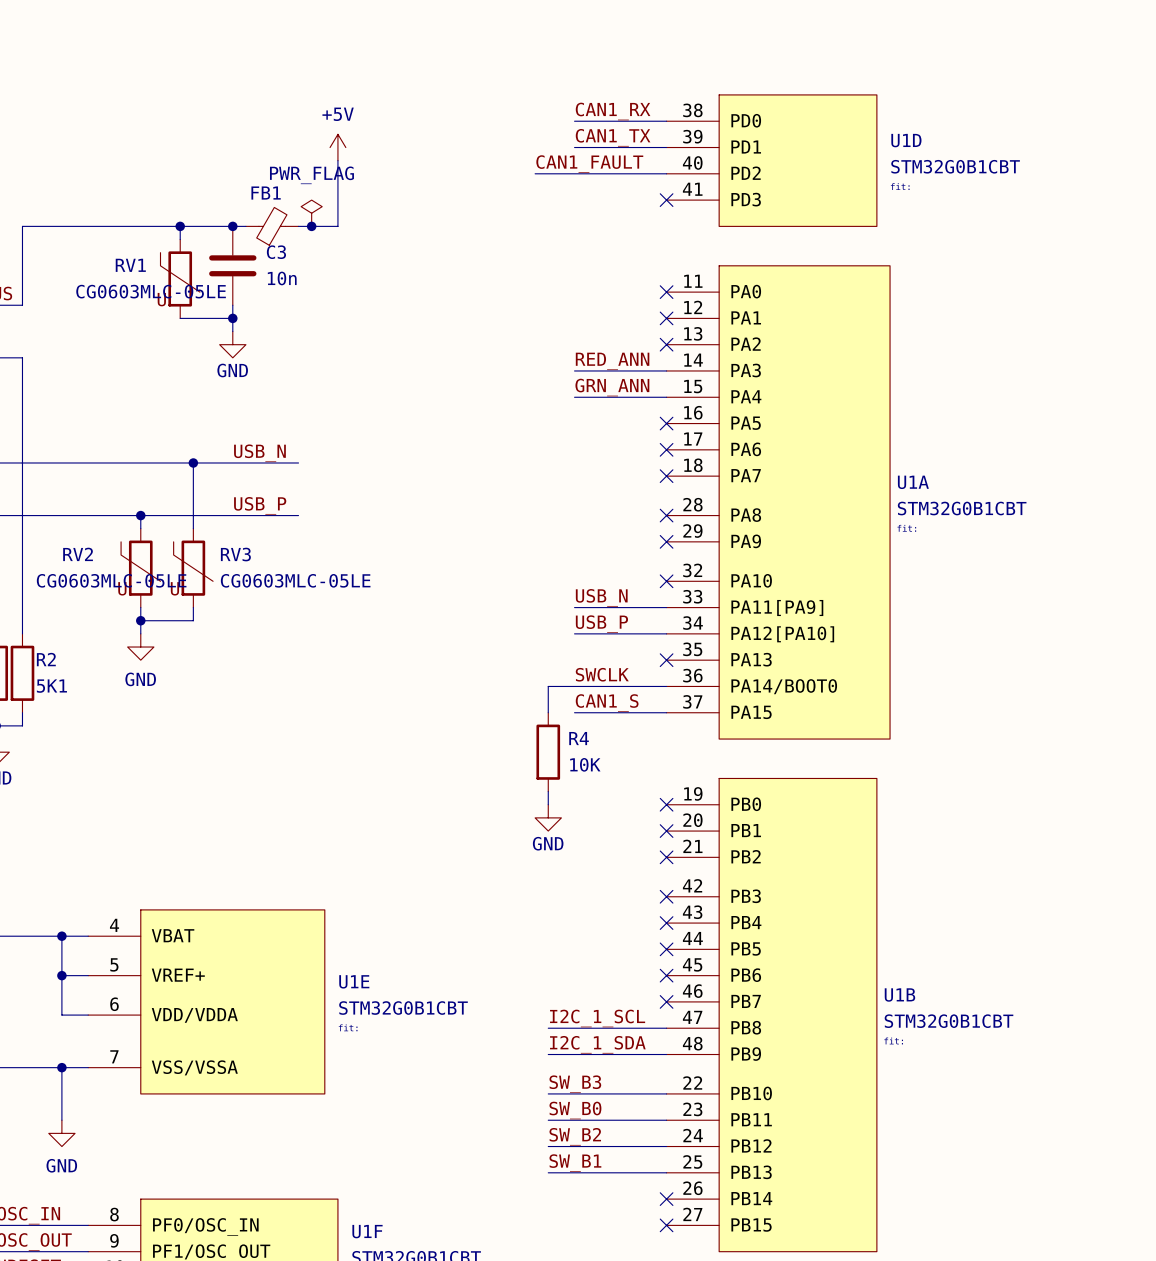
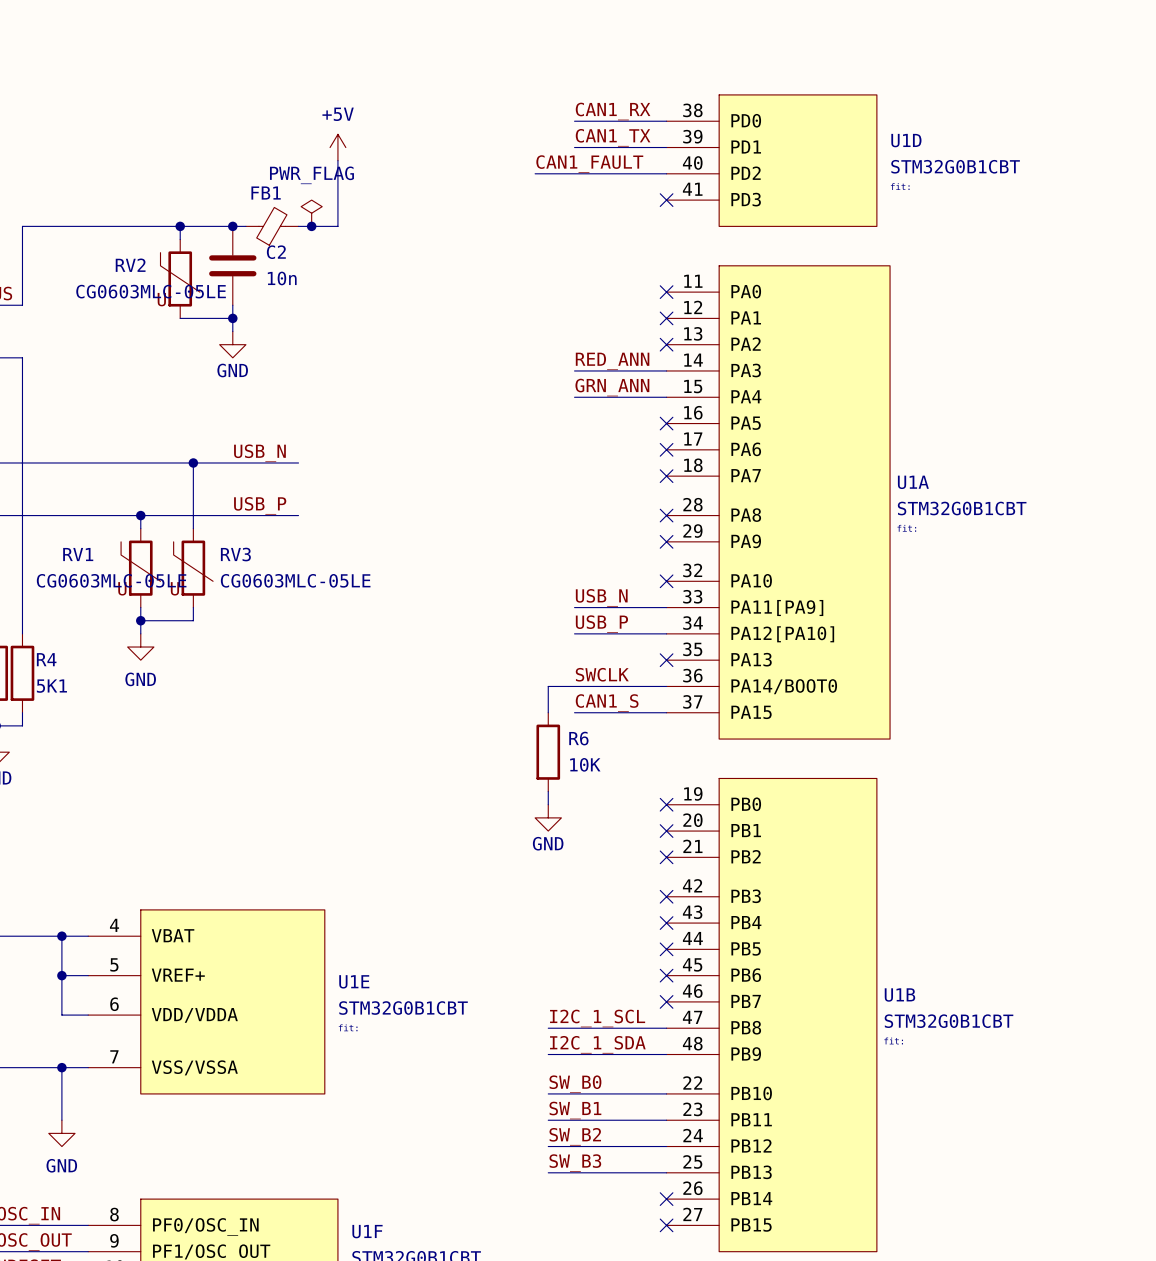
C3 name: C3 (276, 252) -> C2 (276, 252)
RV1 name: RV1 (130, 265) -> RV2 (130, 265)
RV2 name: RV2 (78, 554) -> RV1 (78, 554)
R2 name: R2 (46, 659) -> R4 (46, 659)
R4 name: R4 (579, 738) -> R6 (578, 738)
label: SW_B3 (575, 1084) -> SW_B0 (575, 1084)
label: SW_B0 (575, 1110) -> SW_B1 (575, 1110)
label: SW_B1 (575, 1163) -> SW_B3 (575, 1163)

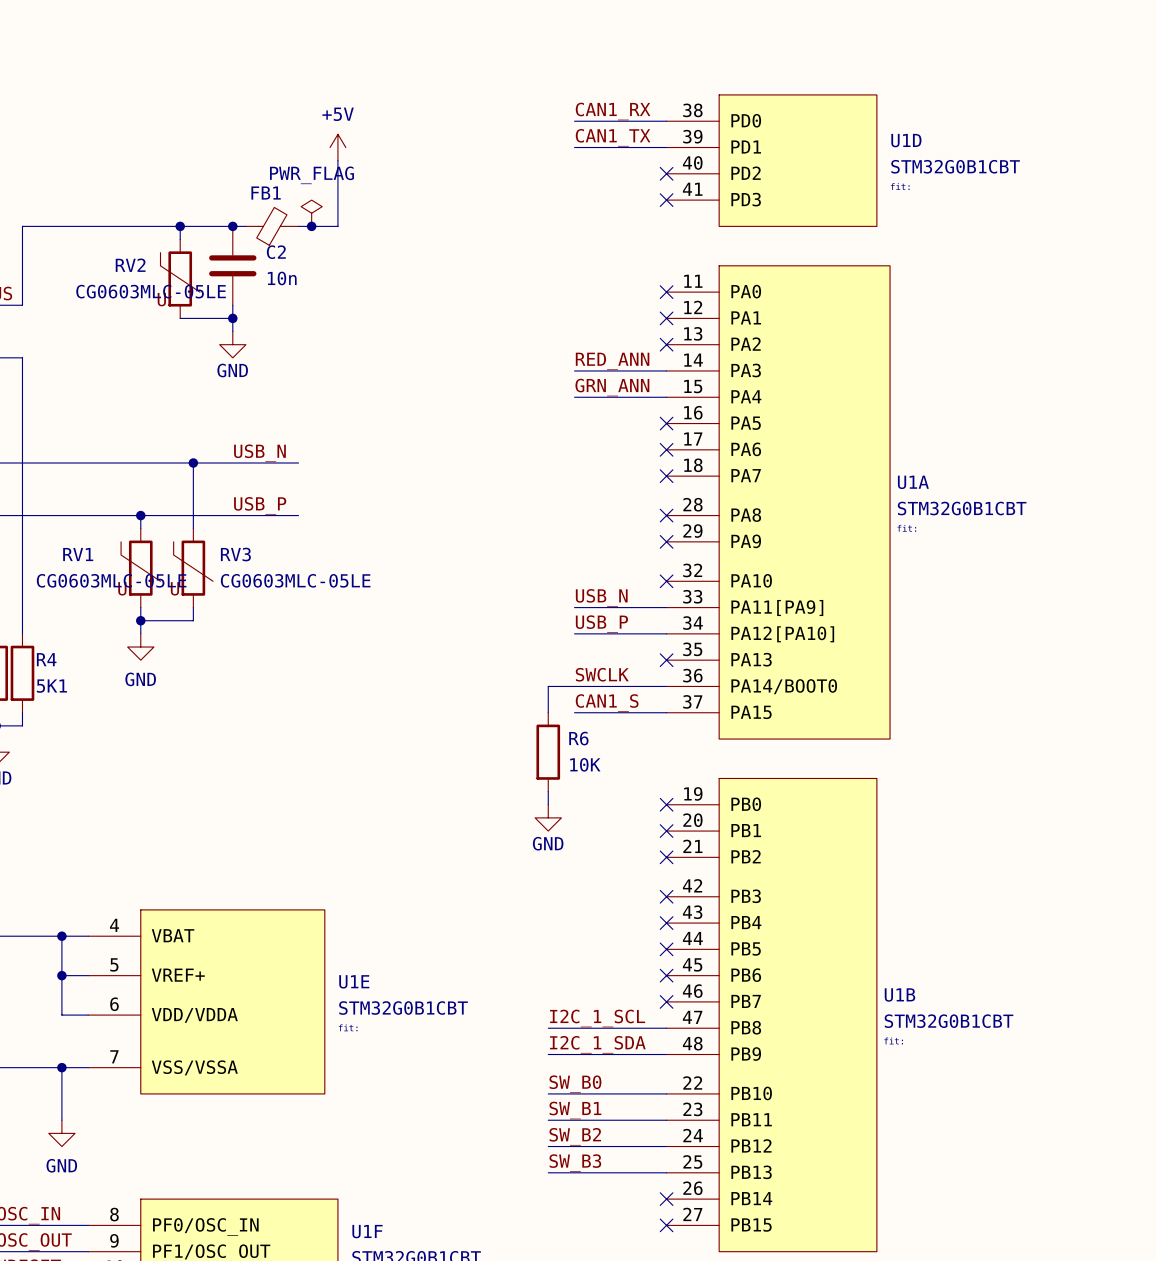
label: CAN1_FAULT (589, 164) -> none
wire: (535, 173) (666, 173) -> none
no-connect mark: none -> (666, 173)

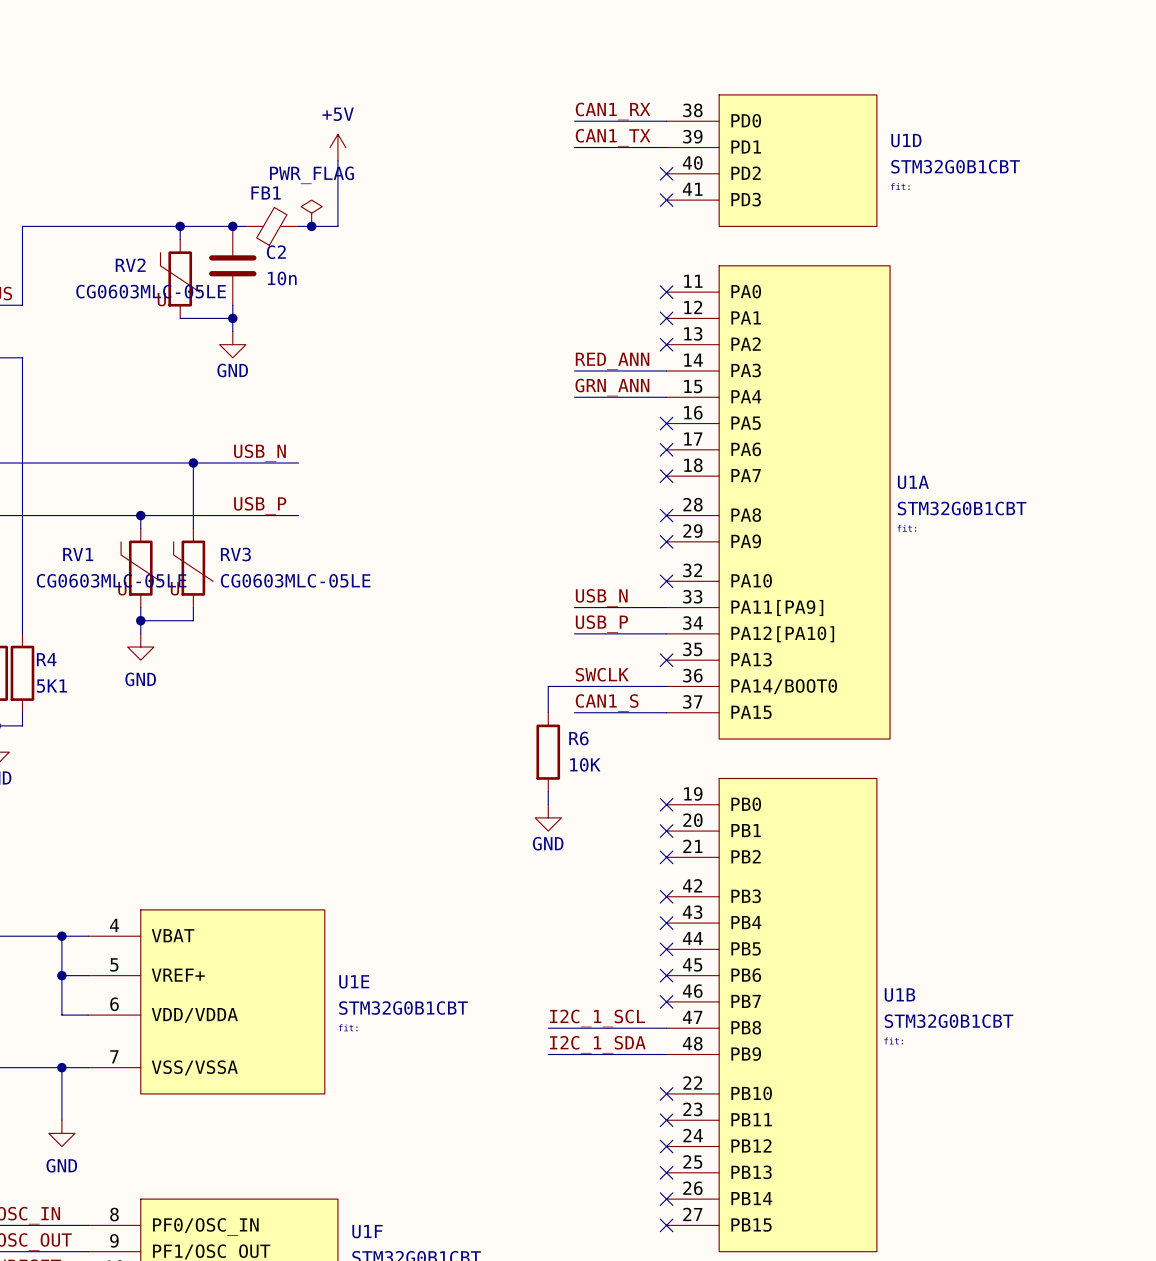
label: SW_B0 (575, 1084) -> none
wire: (548, 1093) (666, 1093) -> none
no-connect mark: none -> (666, 1093)
label: SW_B1 (575, 1110) -> none
wire: (548, 1120) (666, 1120) -> none
no-connect mark: none -> (666, 1120)
label: SW_B2 (575, 1136) -> none
wire: (548, 1146) (666, 1146) -> none
no-connect mark: none -> (666, 1146)
label: SW_B3 (575, 1163) -> none
wire: (548, 1172) (666, 1172) -> none
no-connect mark: none -> (666, 1172)

